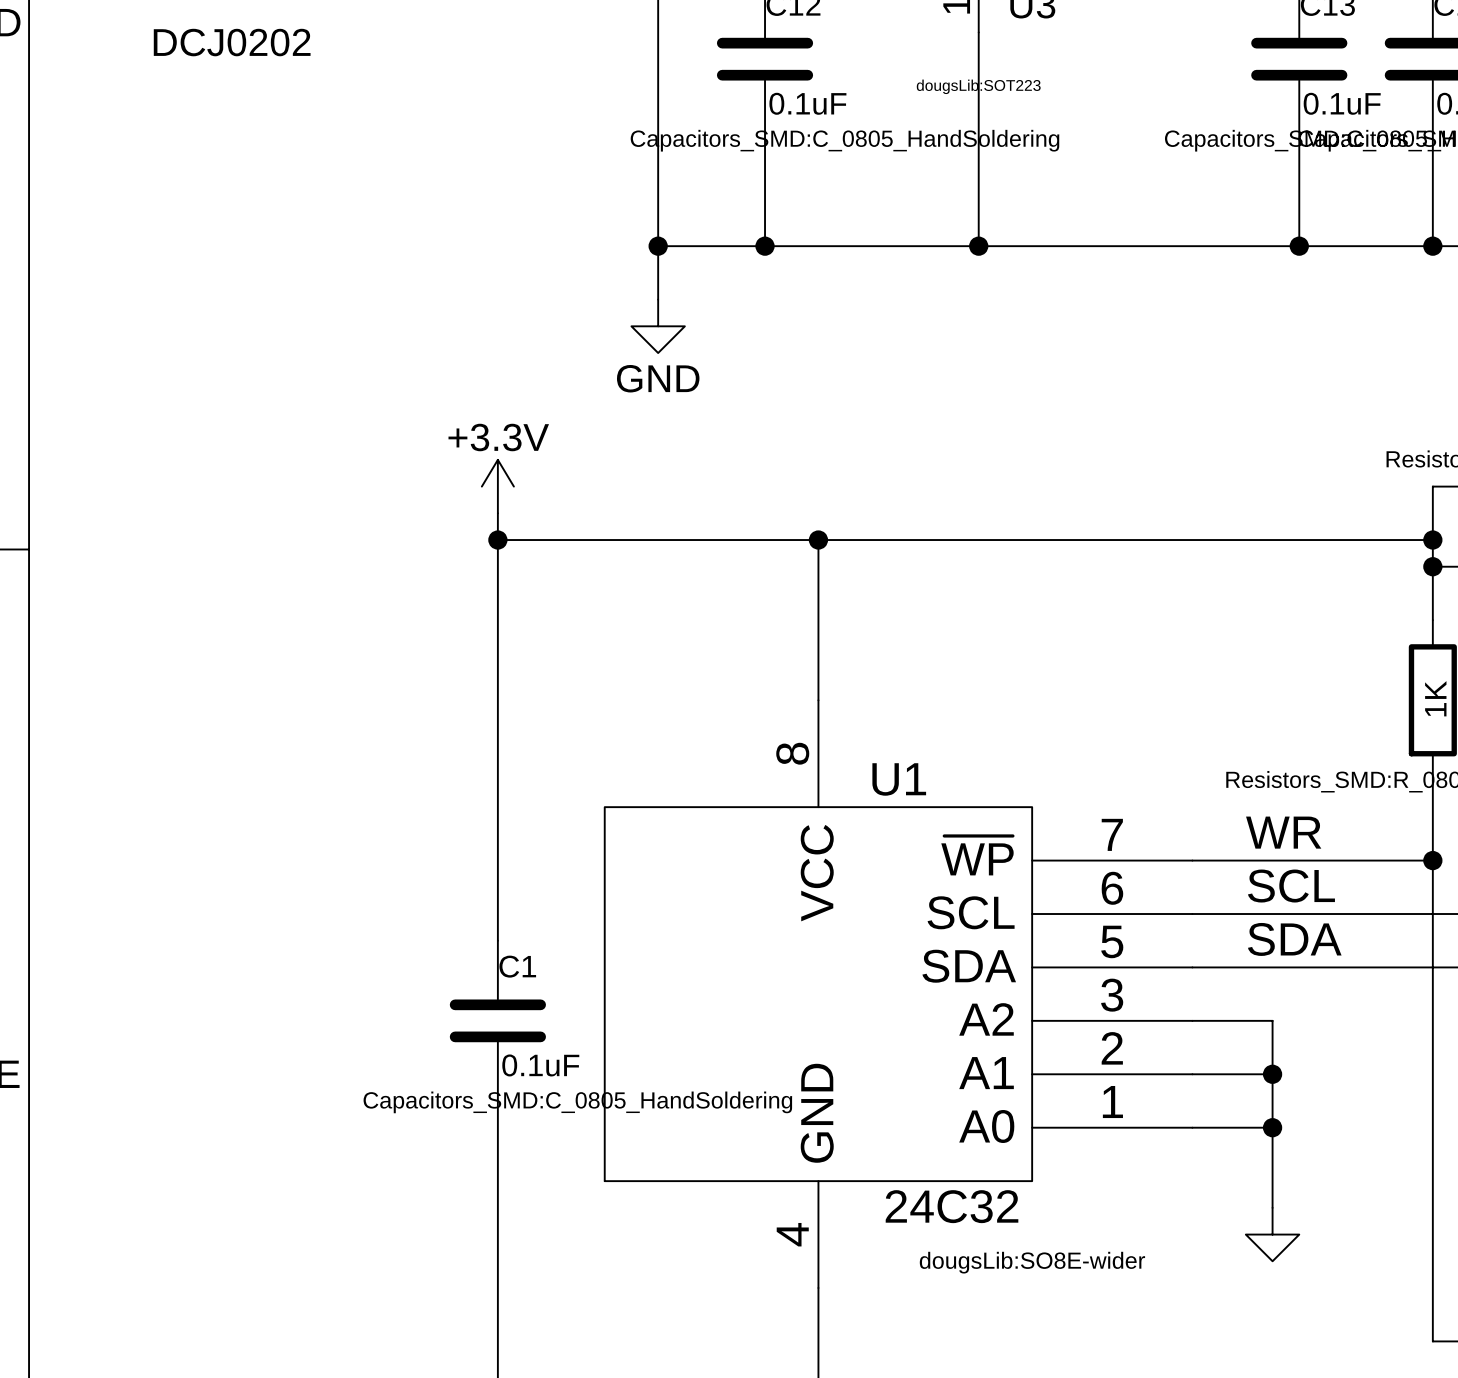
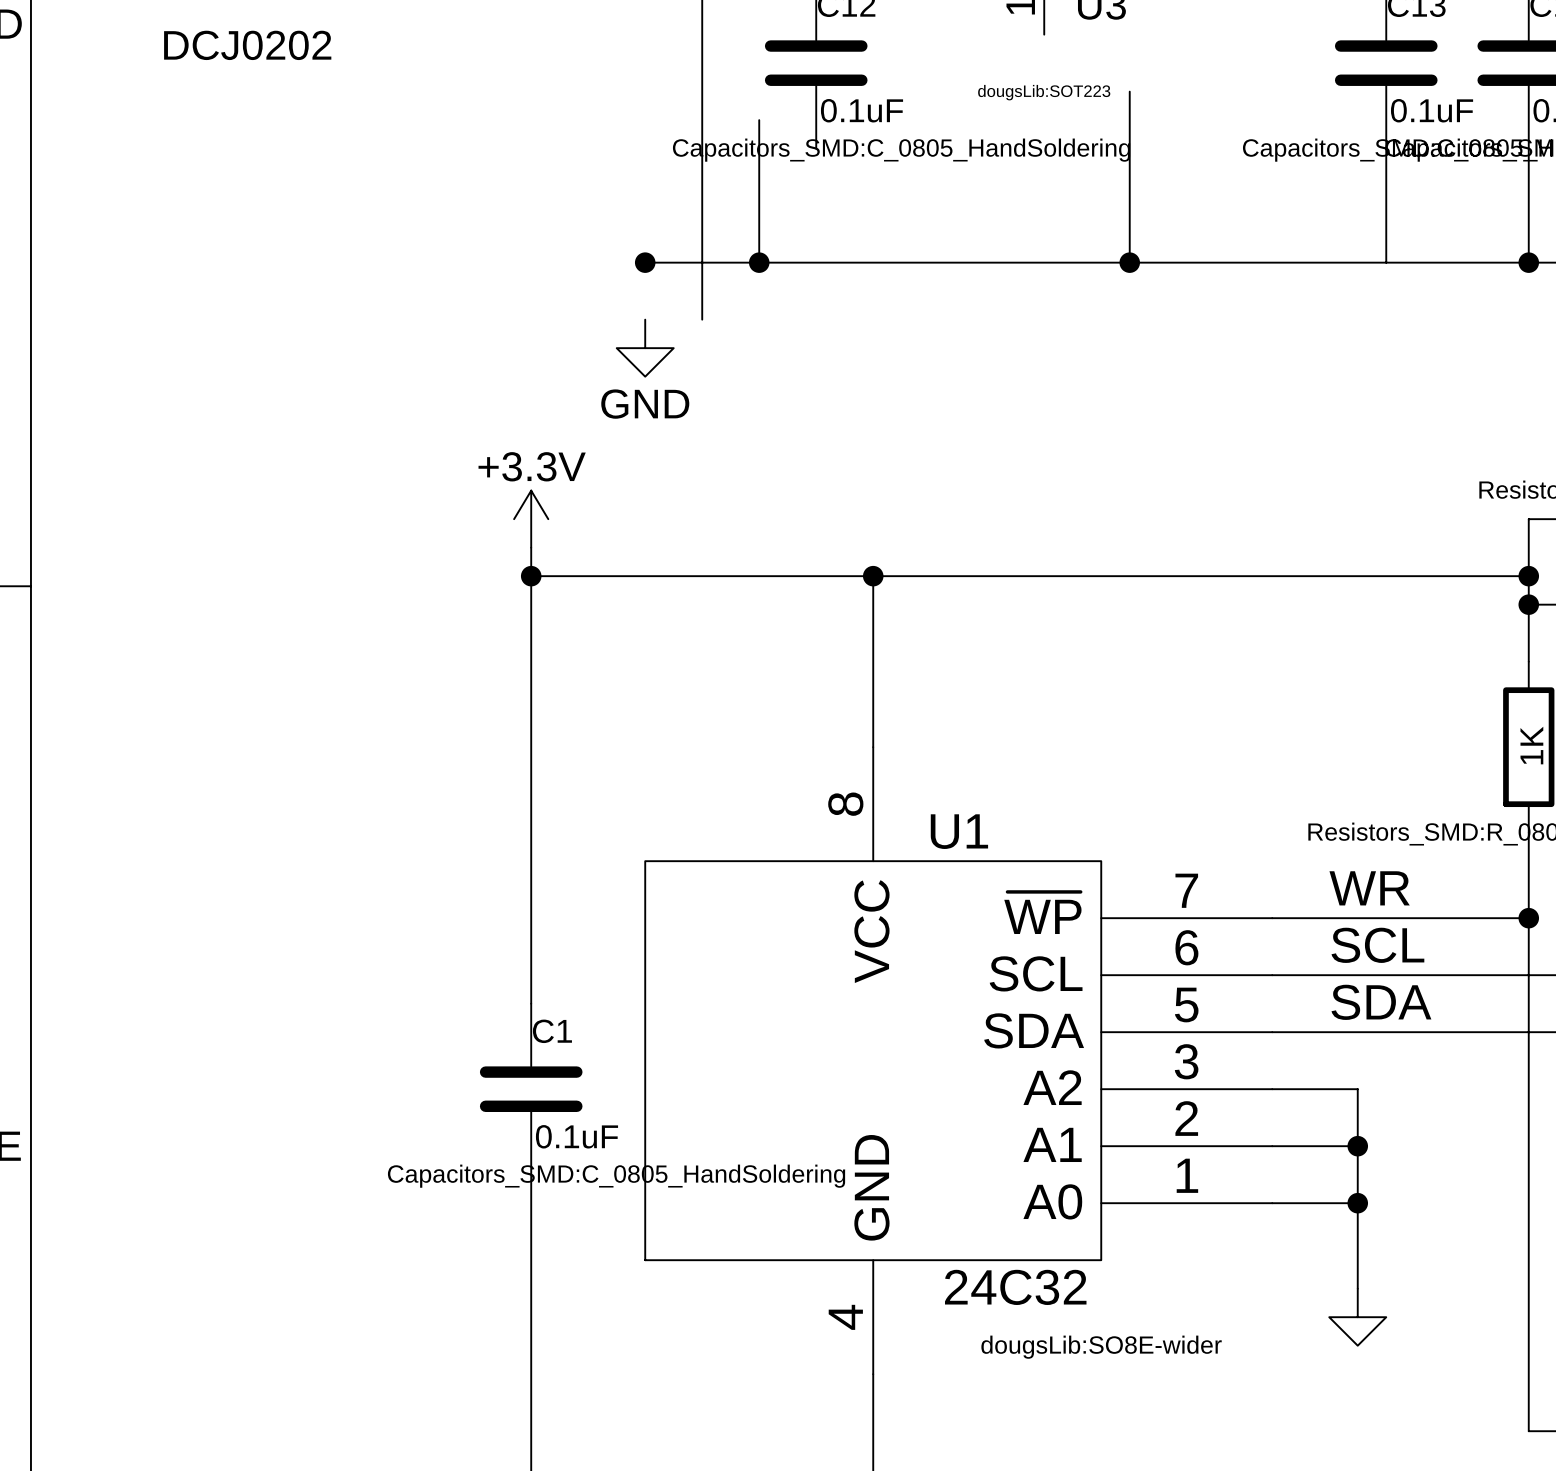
wire: (978, 32) (978, 246) -> none
wire: none -> (1129, 91) (1129, 262)
wire: none -> (759, 120) (759, 262)
wire: (765, 139) (765, 246) -> none
wire: none -> (645, 262) (702, 262)
junction: none -> (645, 262)
junction: (658, 246) -> none
junction: none -> (759, 262)
junction: (765, 246) -> none
junction position: (978, 246) -> (1129, 262)
junction: (1299, 246) -> none
power symbol position: GND (658, 326) -> GND (645, 348)

